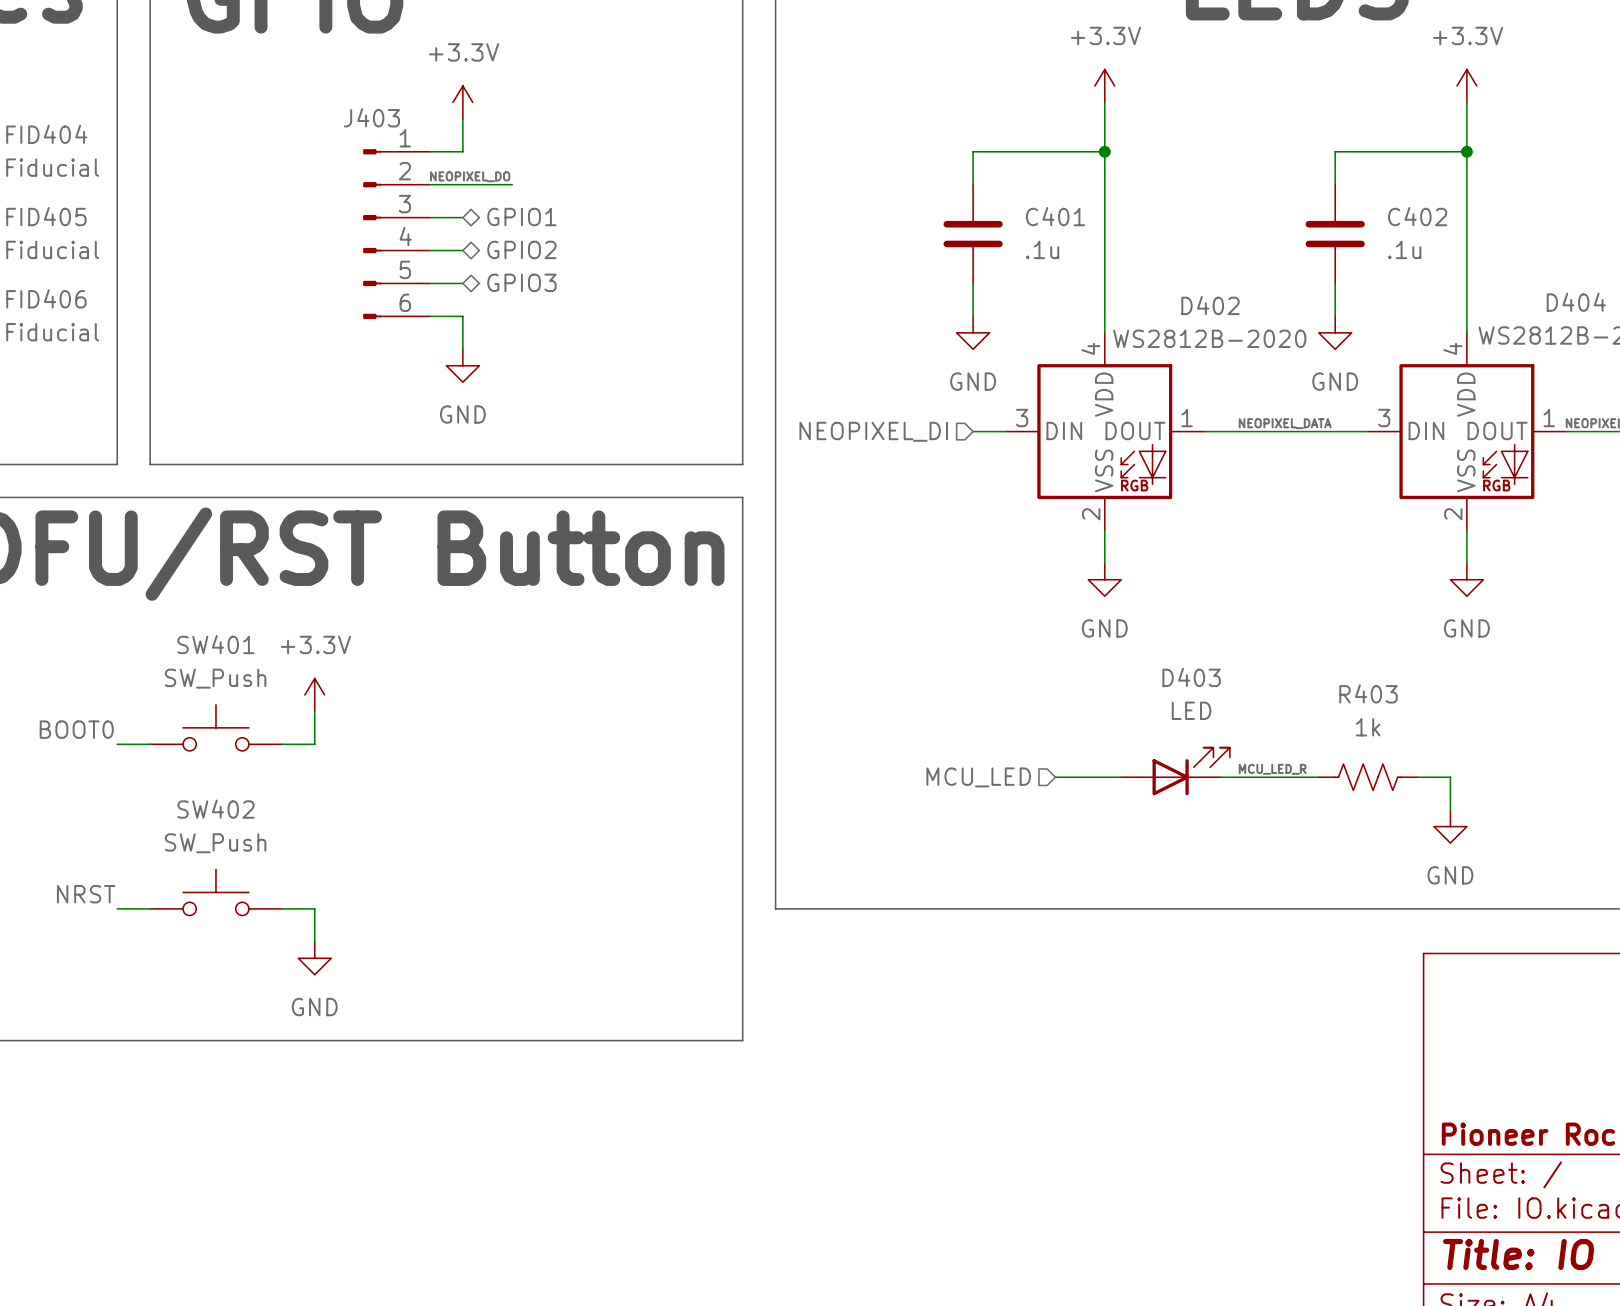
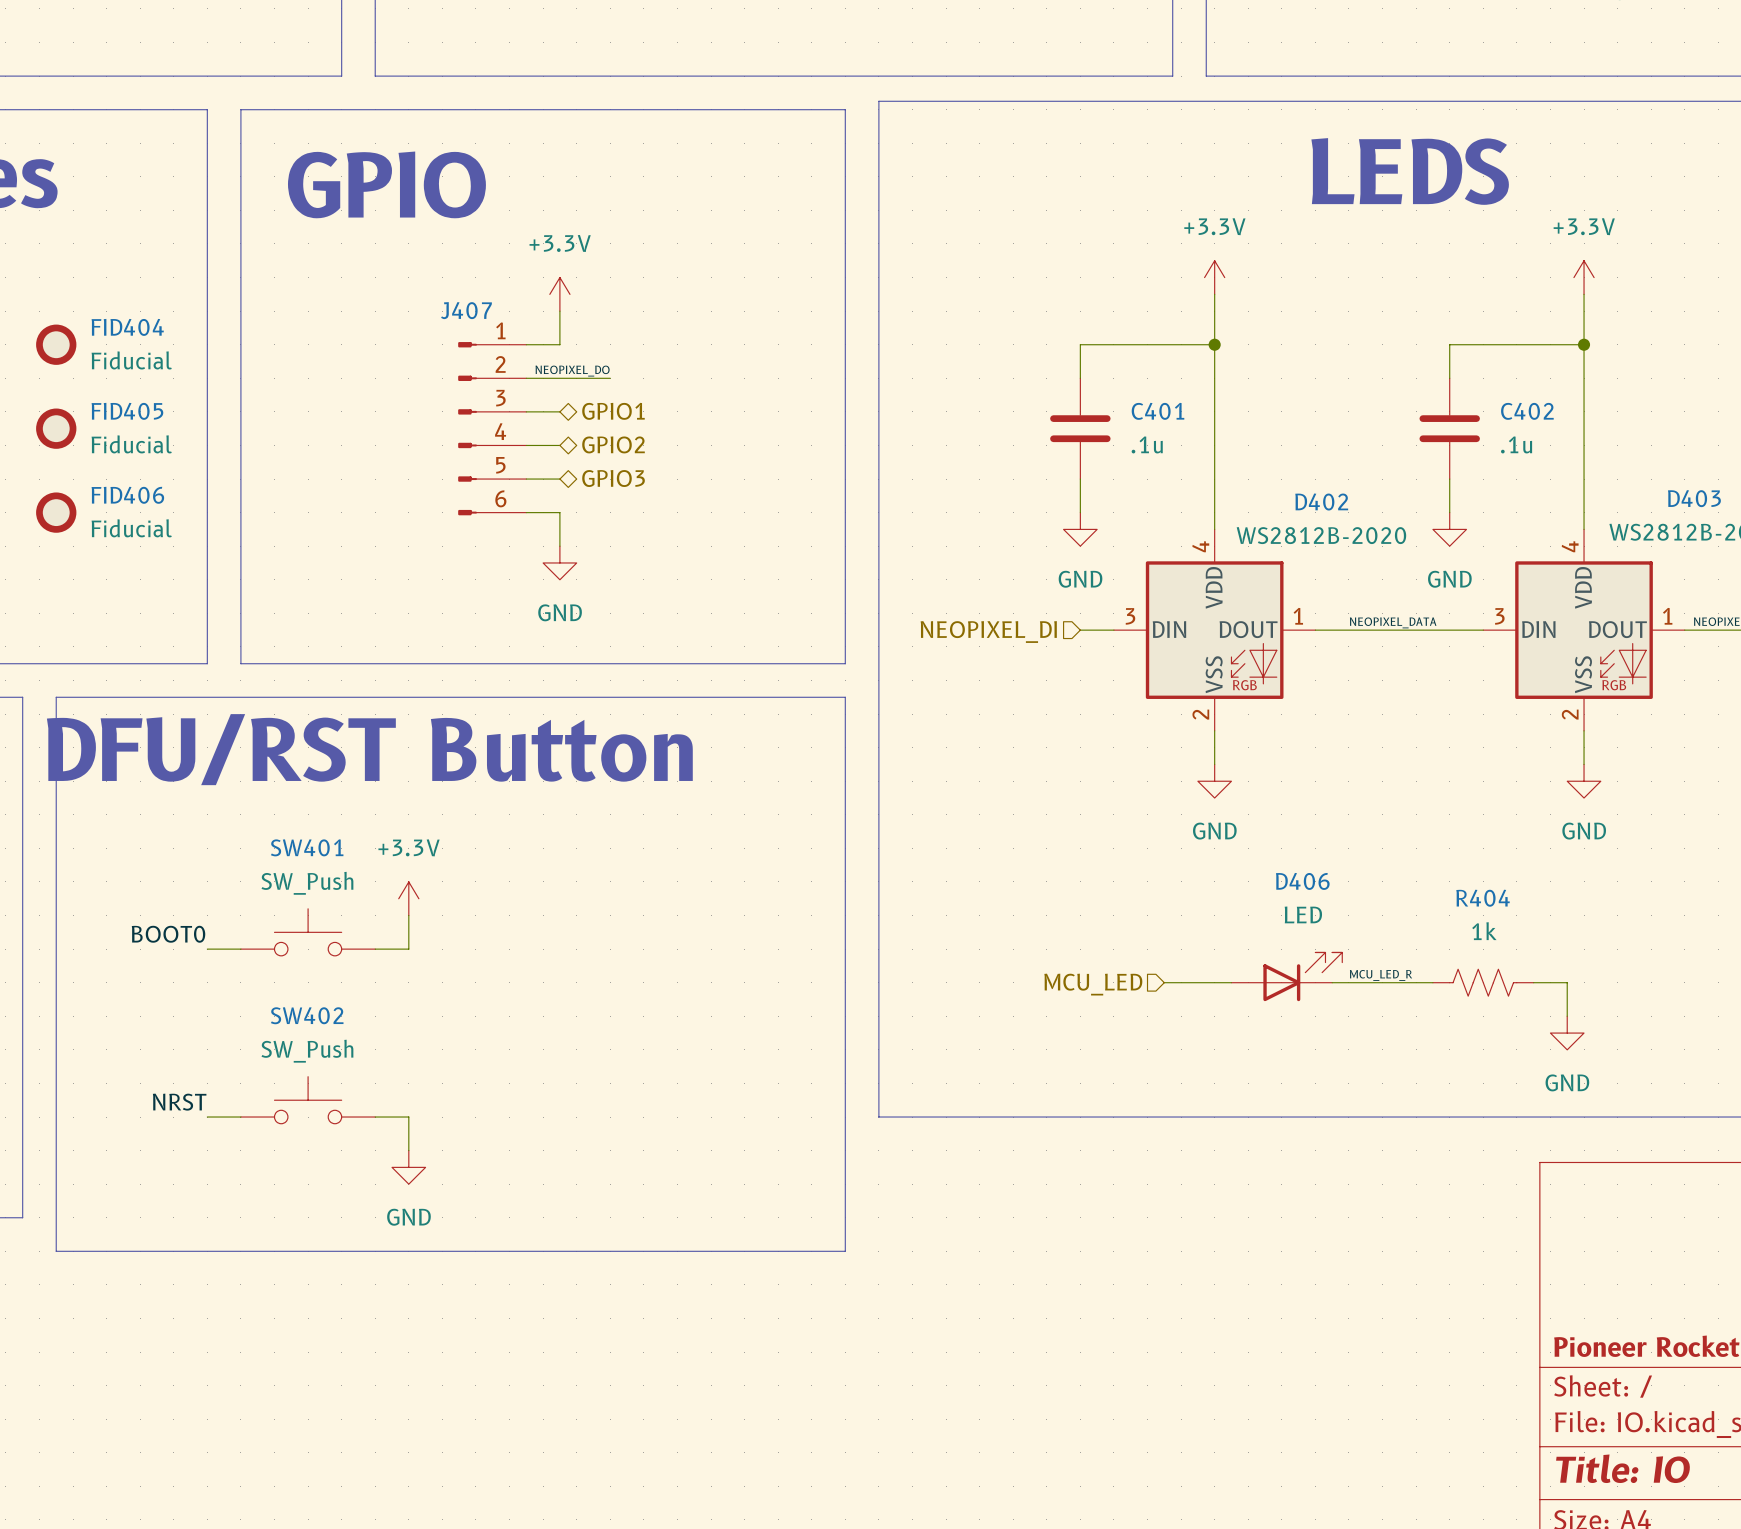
J403 name: J403 (371, 117) -> J407 (466, 310)
D404 name: D404 (1576, 302) -> D403 (1694, 498)
D403 name: D403 (1191, 677) -> D406 (1302, 881)
R403 name: R403 (1368, 693) -> R404 (1483, 898)

